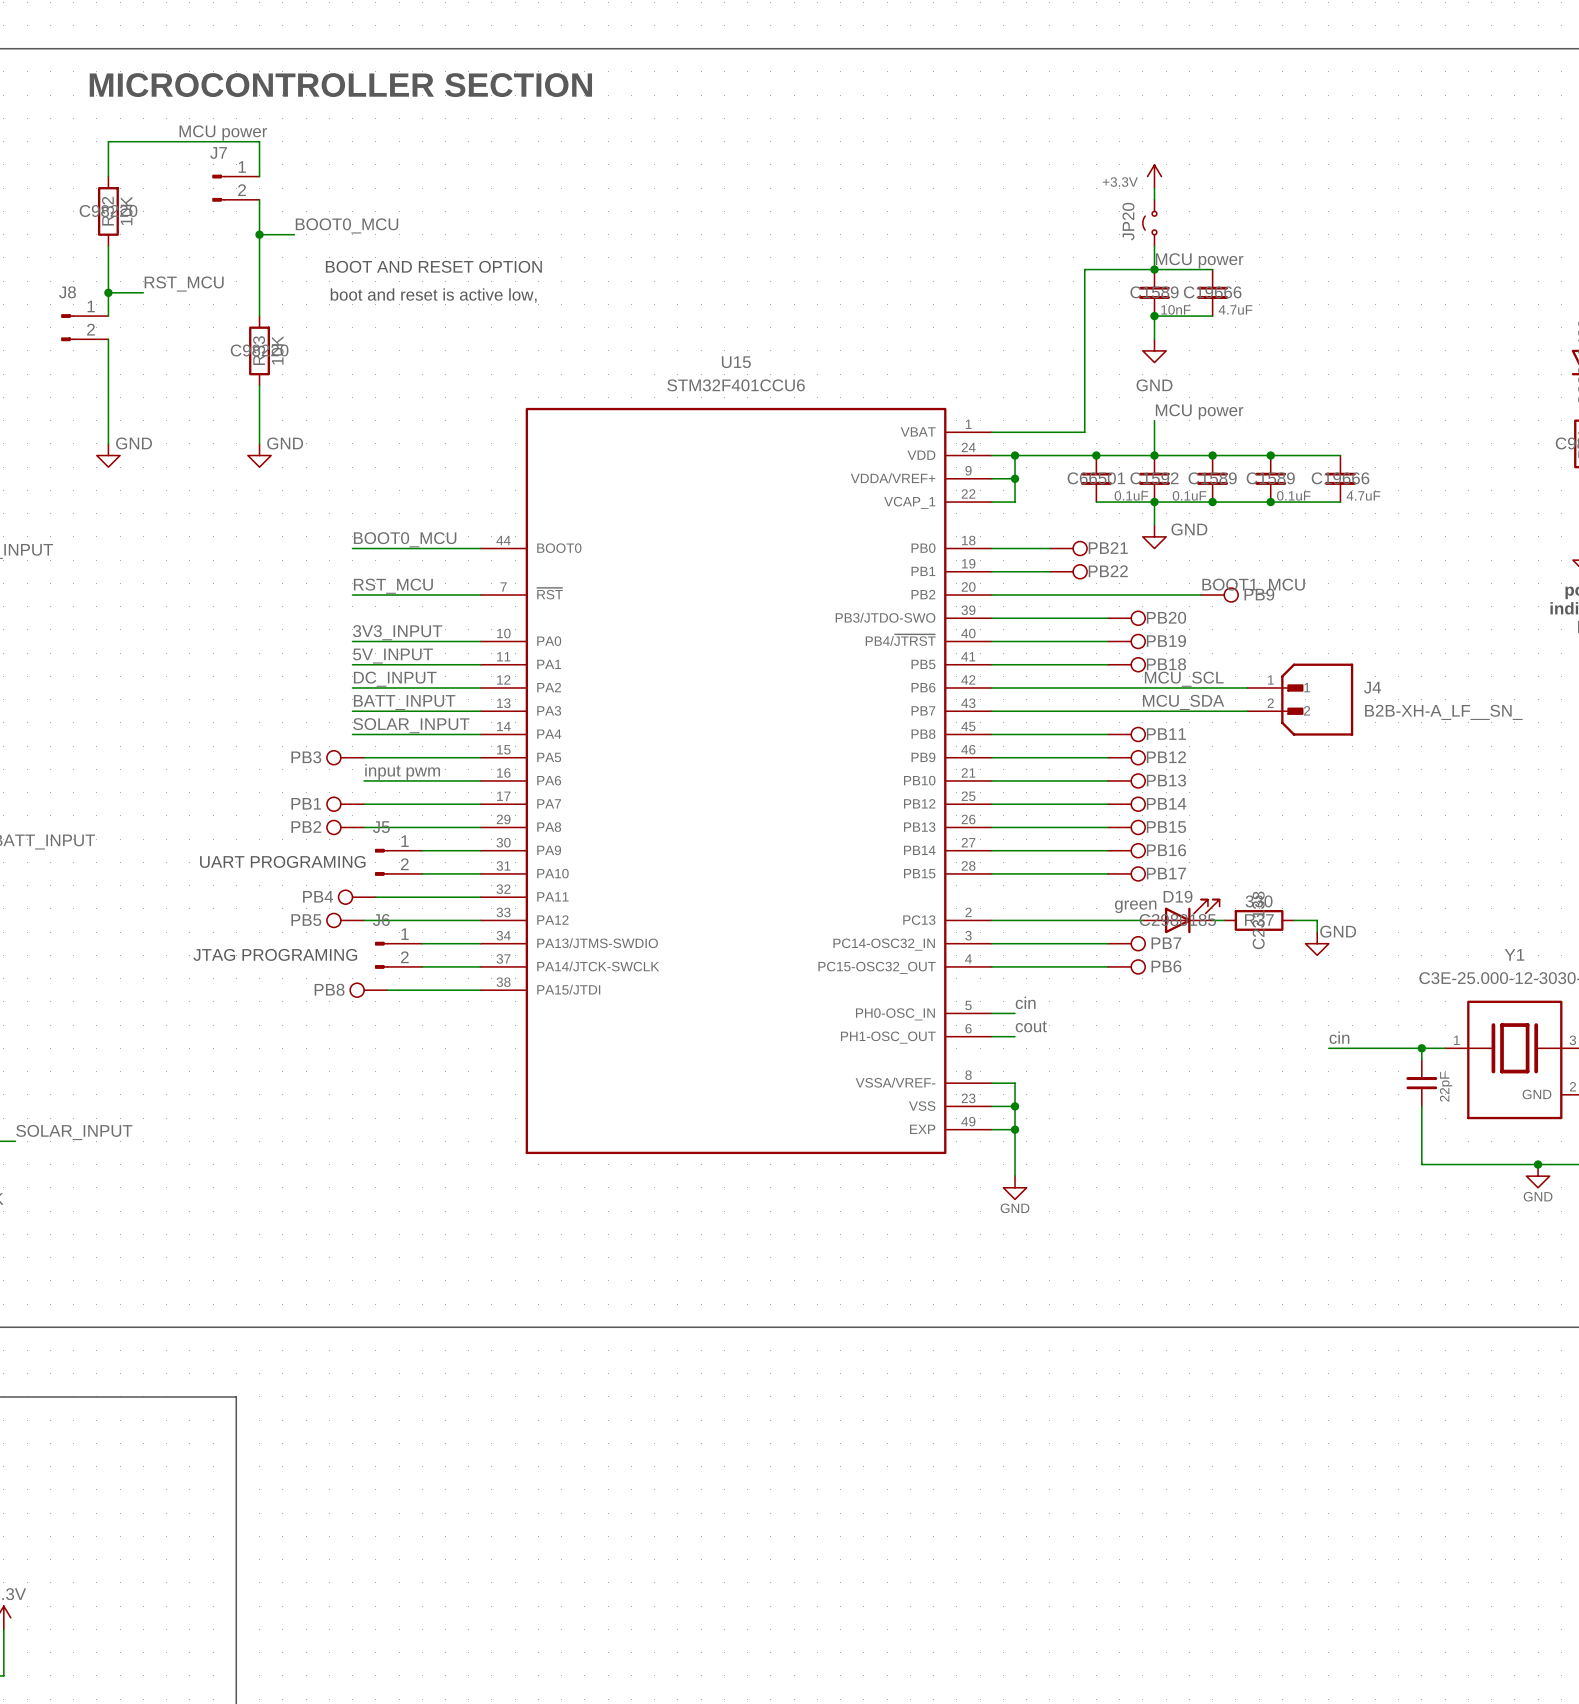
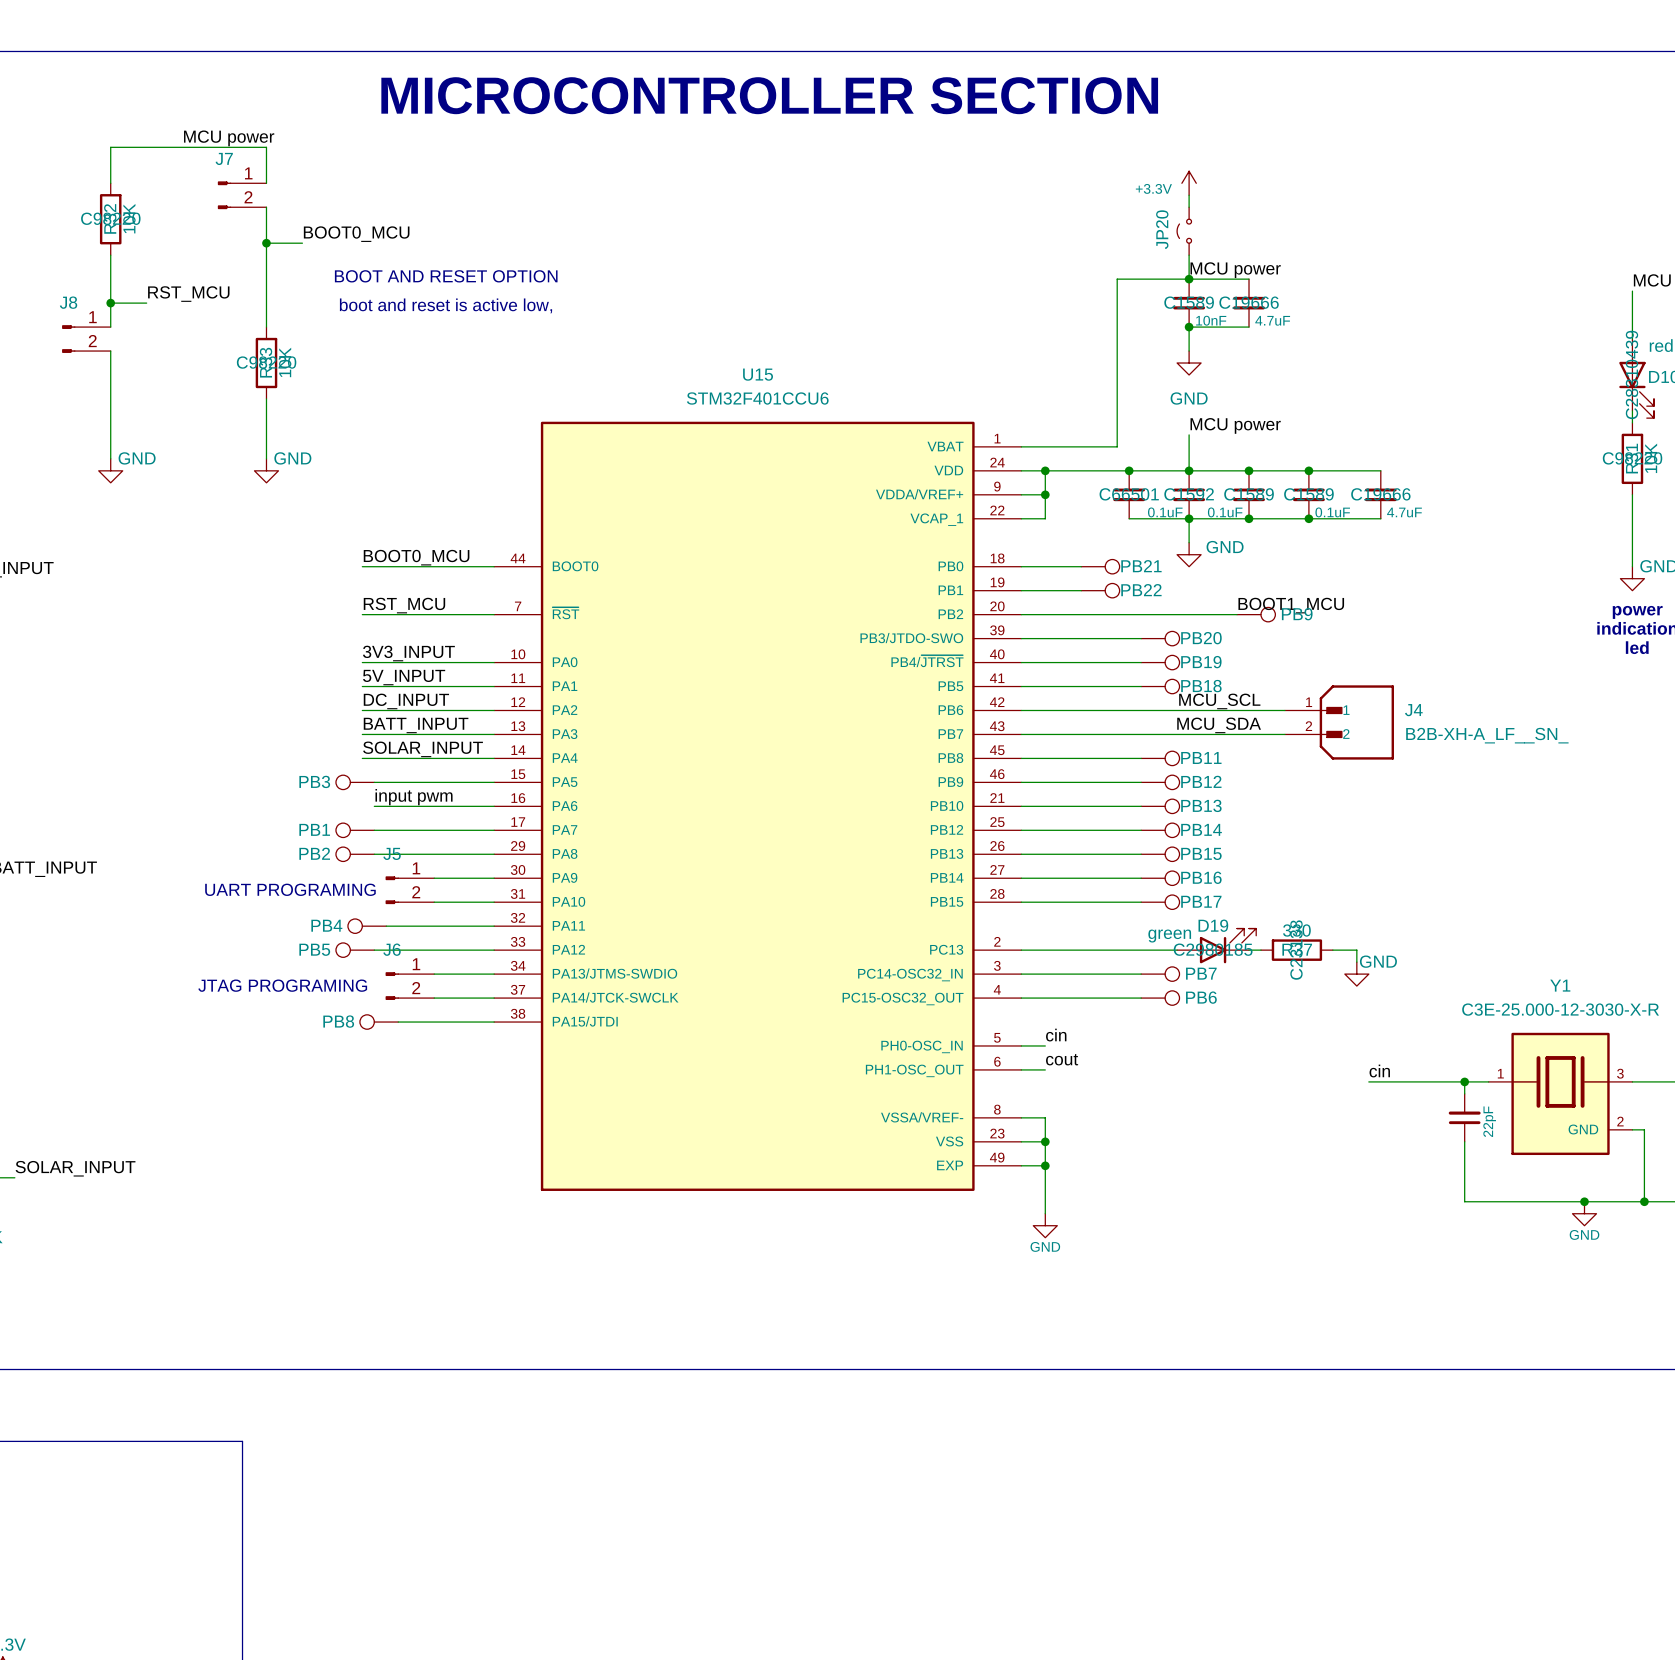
text: MICROCONTROLLER SECTION (340, 85) -> none
text: none -> MICROCONTROLLER SECTION (769, 95)

